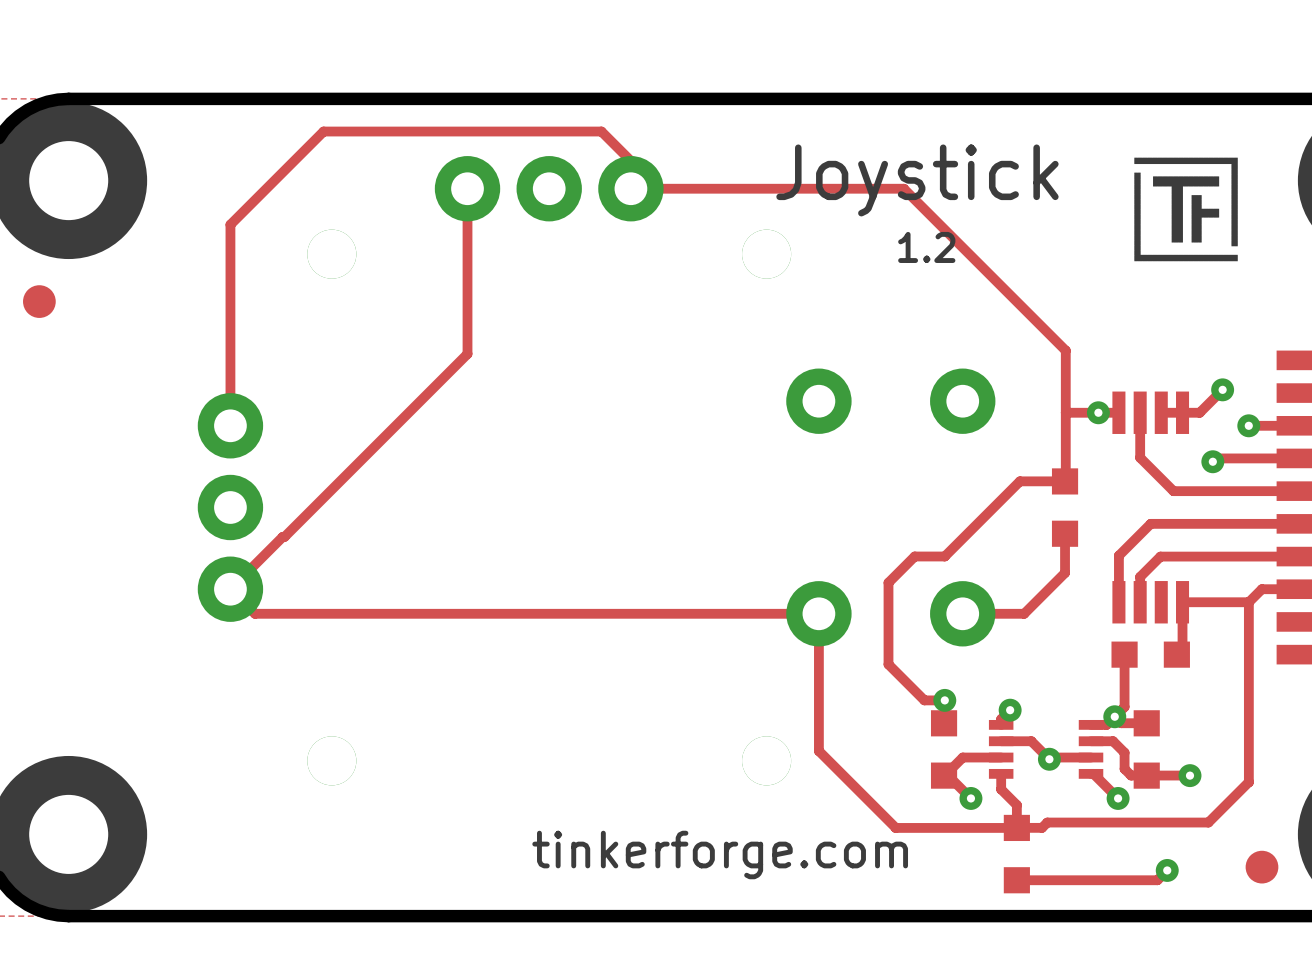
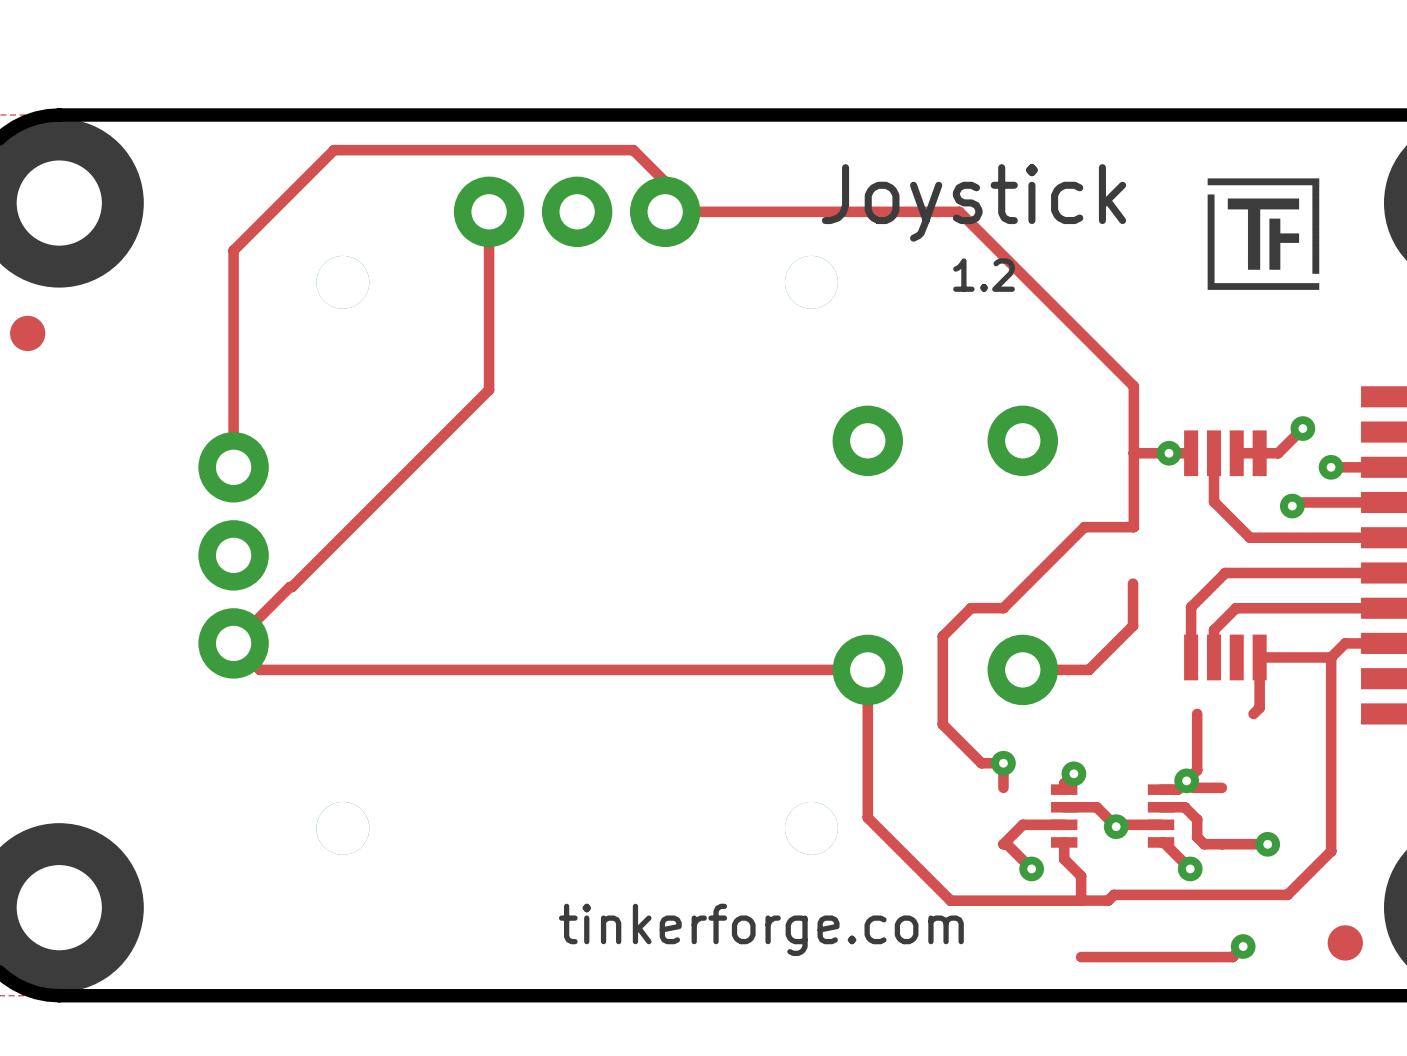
part: (1065, 507) -> none
part: (1150, 654) -> none
part: (944, 749) -> none
part: (1146, 749) -> none
part: (1016, 854) -> none

